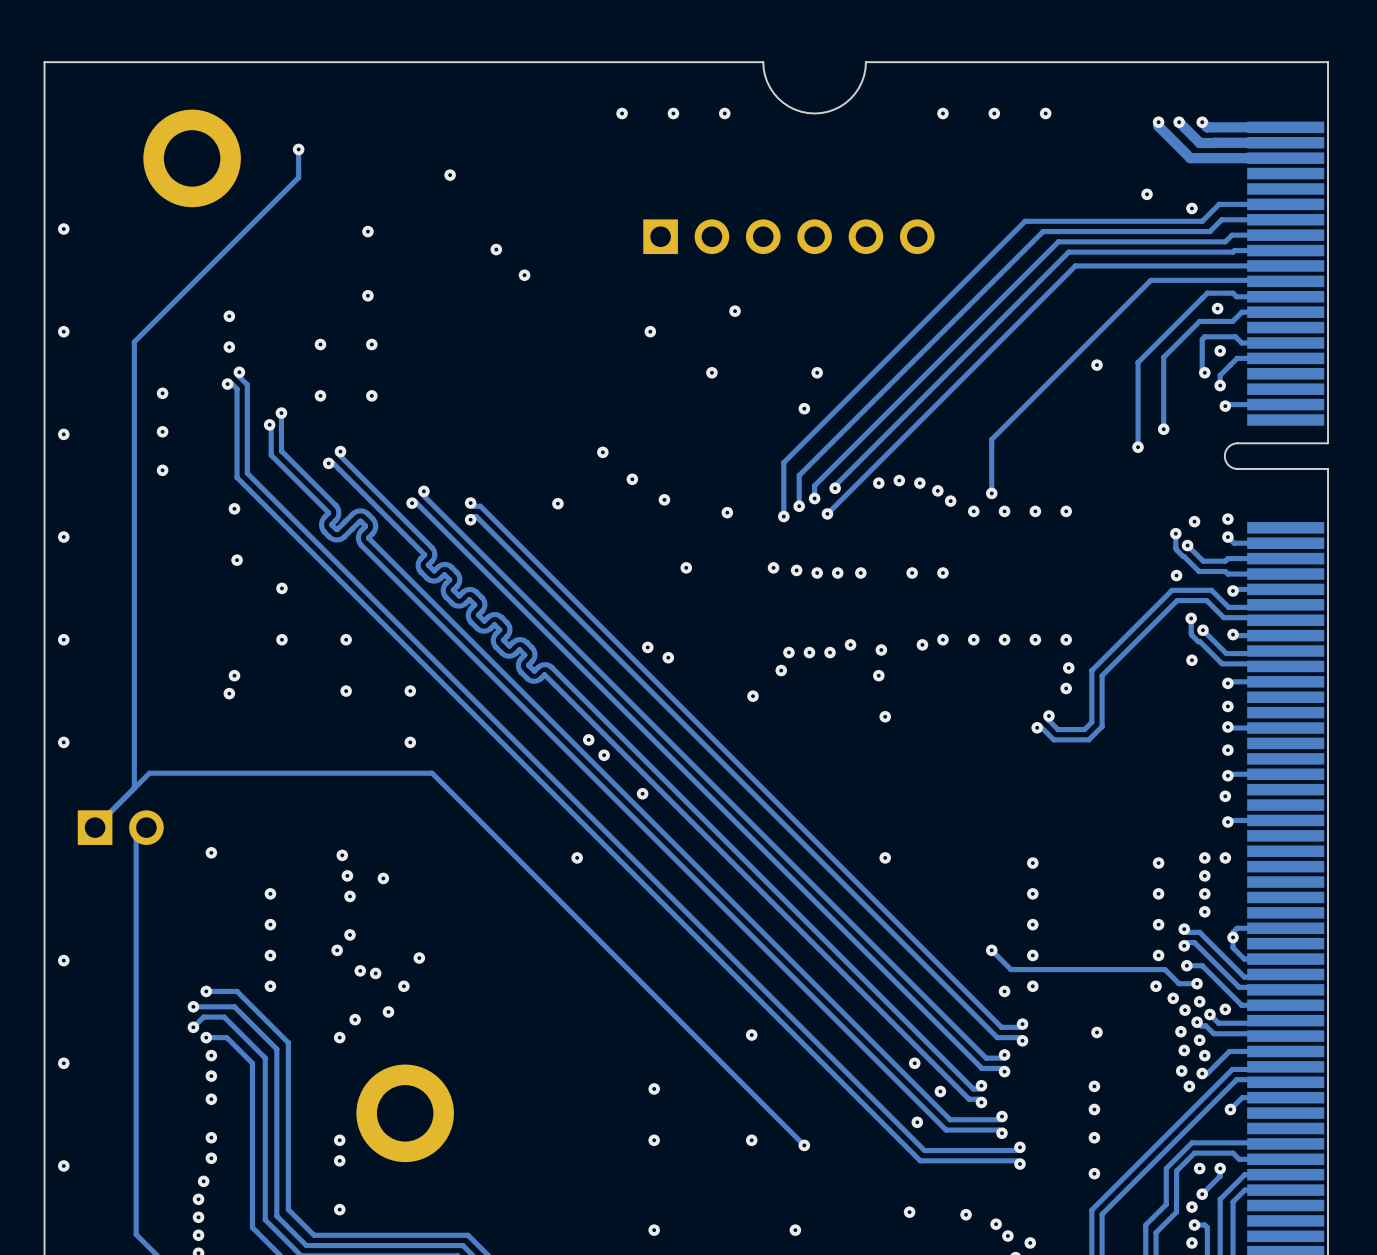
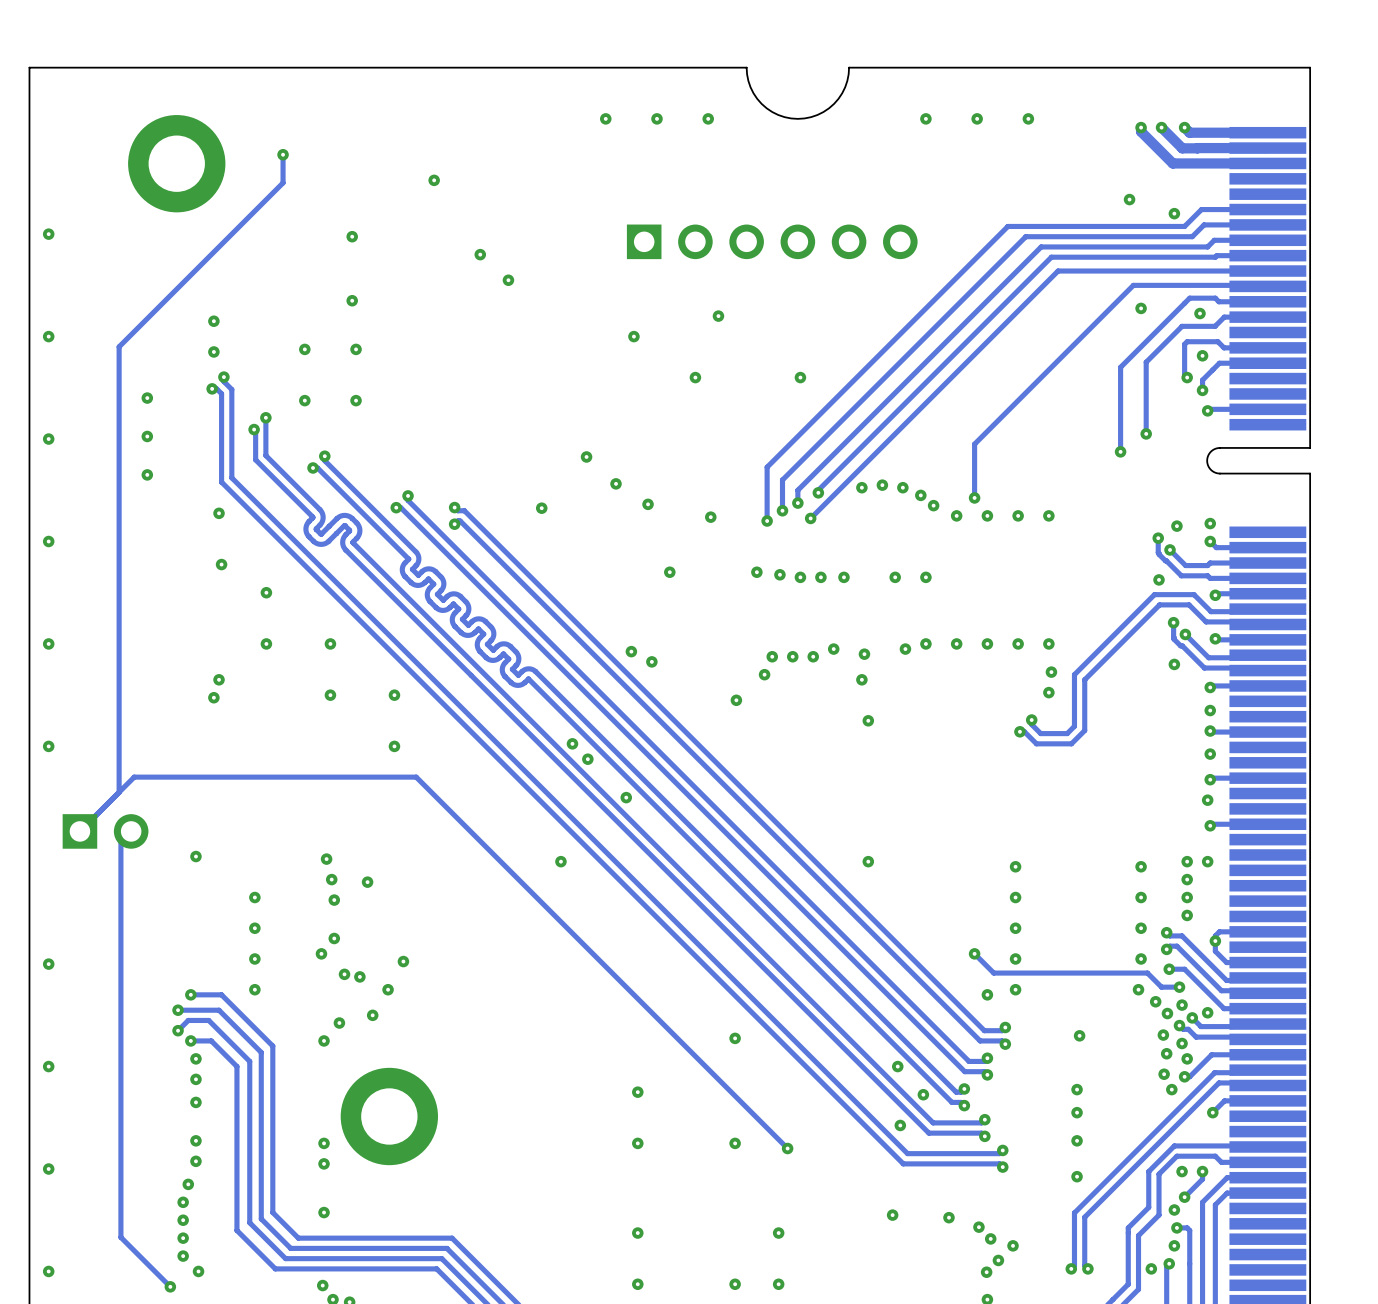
via position: (1096, 365) -> (1141, 308)
via: (804, 408) -> none

